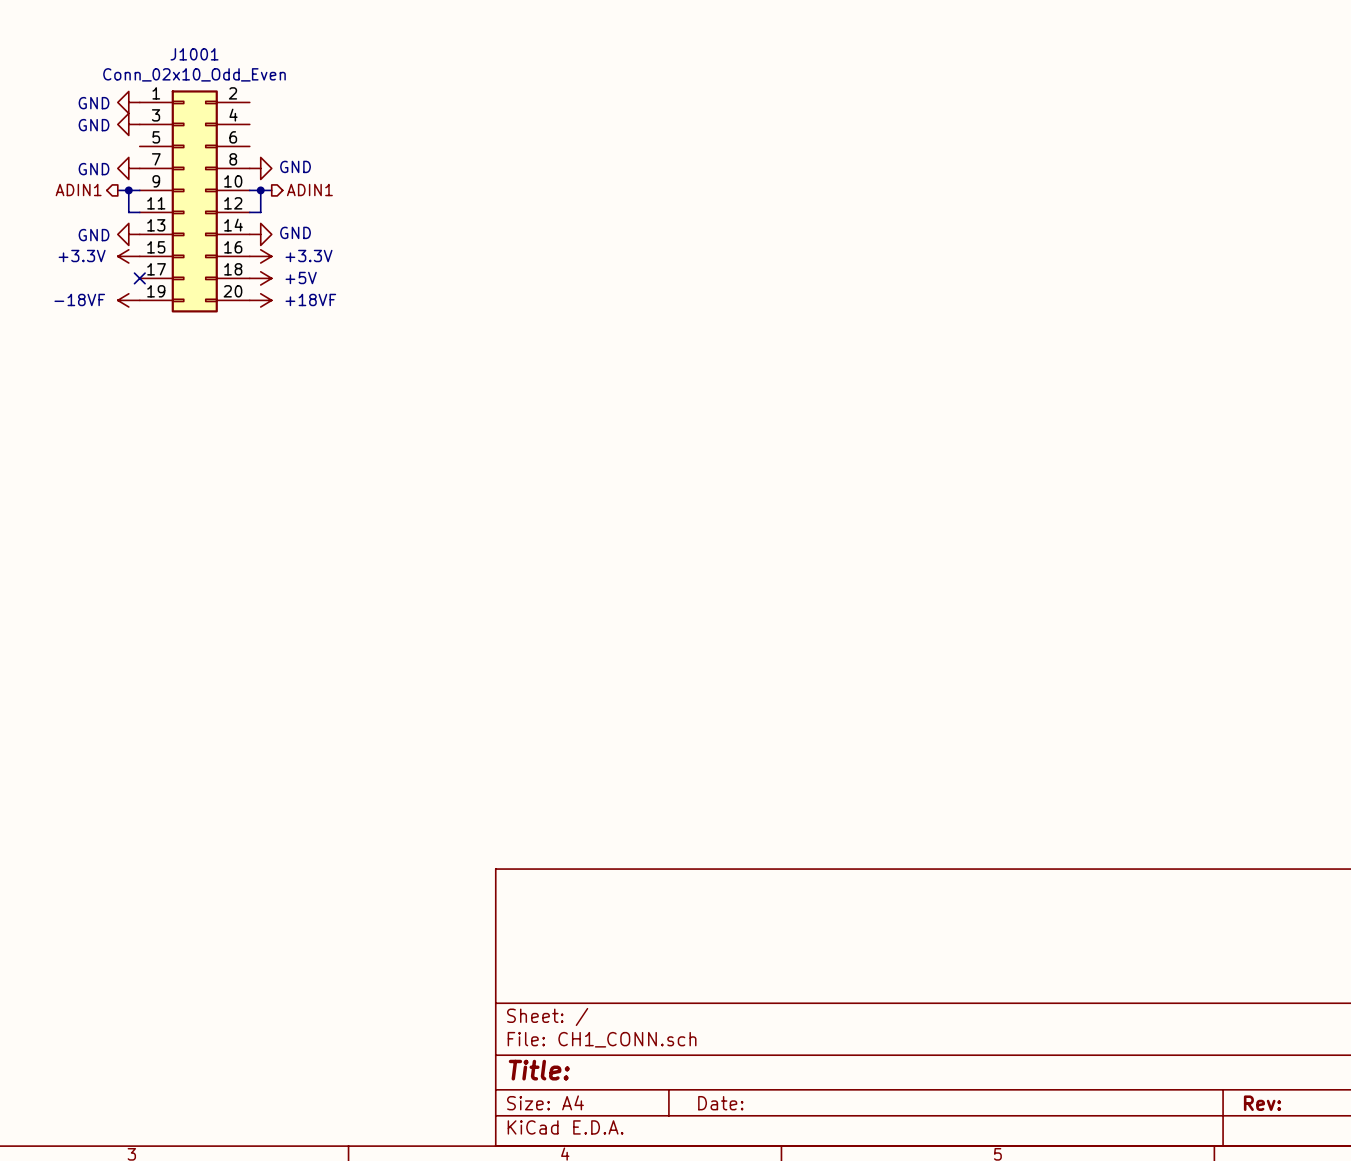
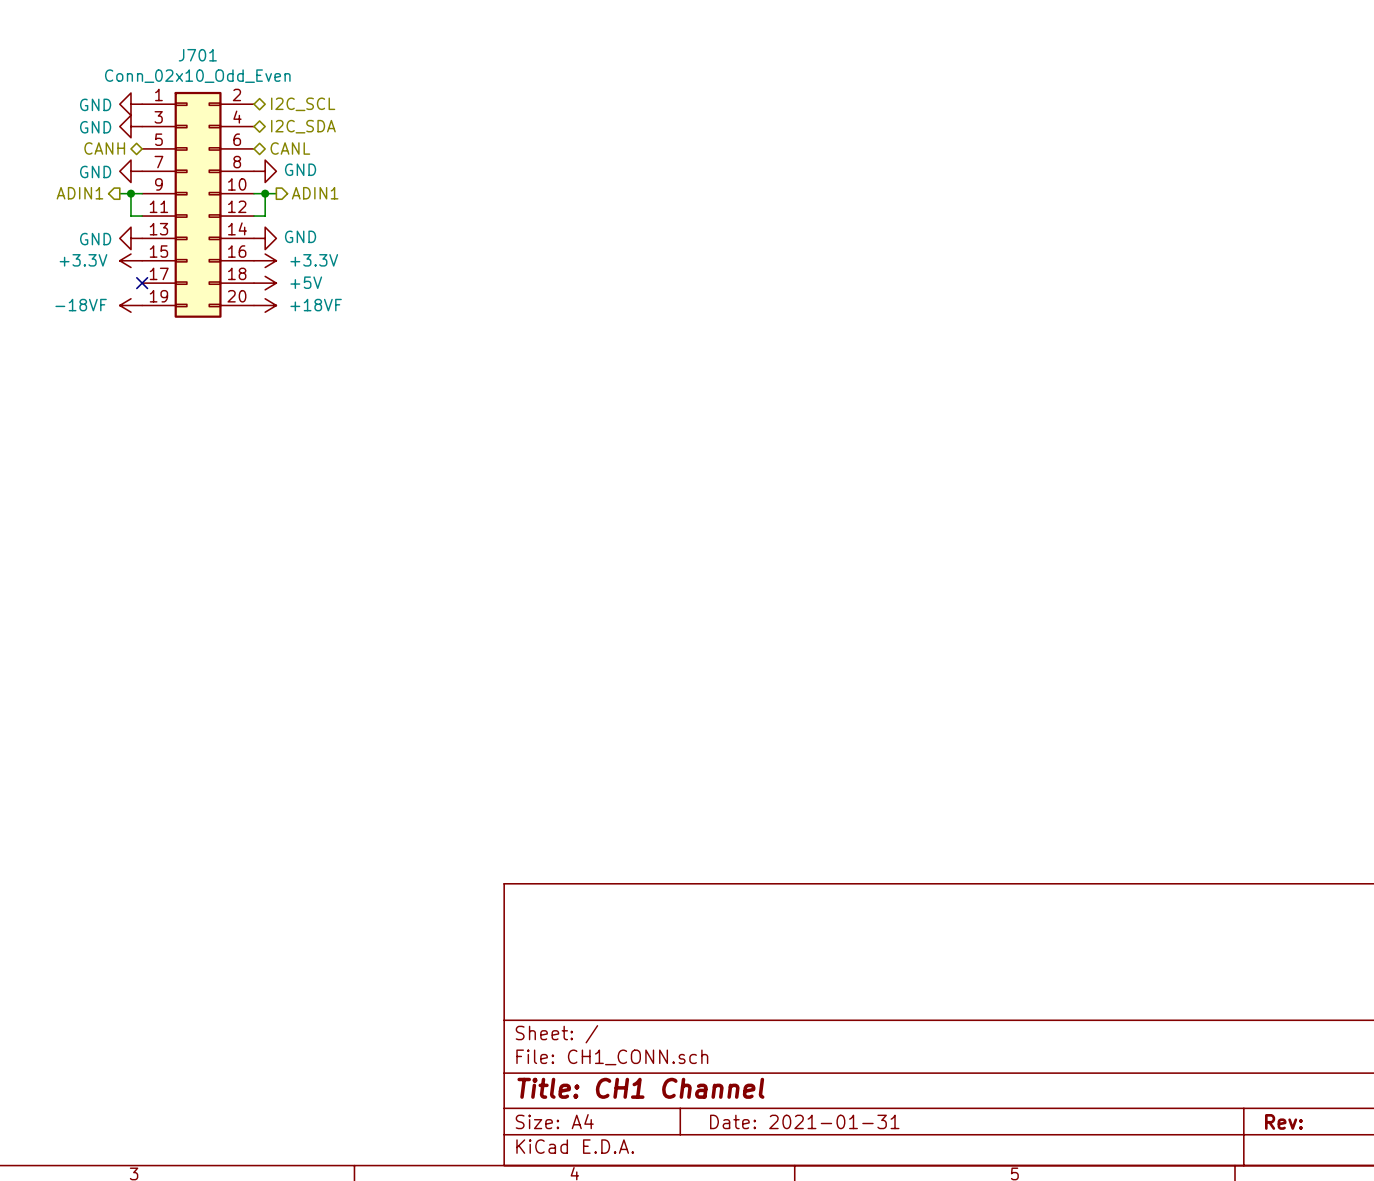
J1001 name: J1001 (194, 54) -> J701 (197, 55)
hierarchical label: none -> I2C_SCL (303, 104)
hierarchical label: none -> I2C_SDA (303, 126)
hierarchical label: none -> CANH (104, 148)
hierarchical label: none -> CANL (290, 148)
title block: Title: (539, 1070) -> Title: CH1 Channel (640, 1088)
title block: Date: (720, 1103) -> Date: 2021-01-31 (804, 1121)

